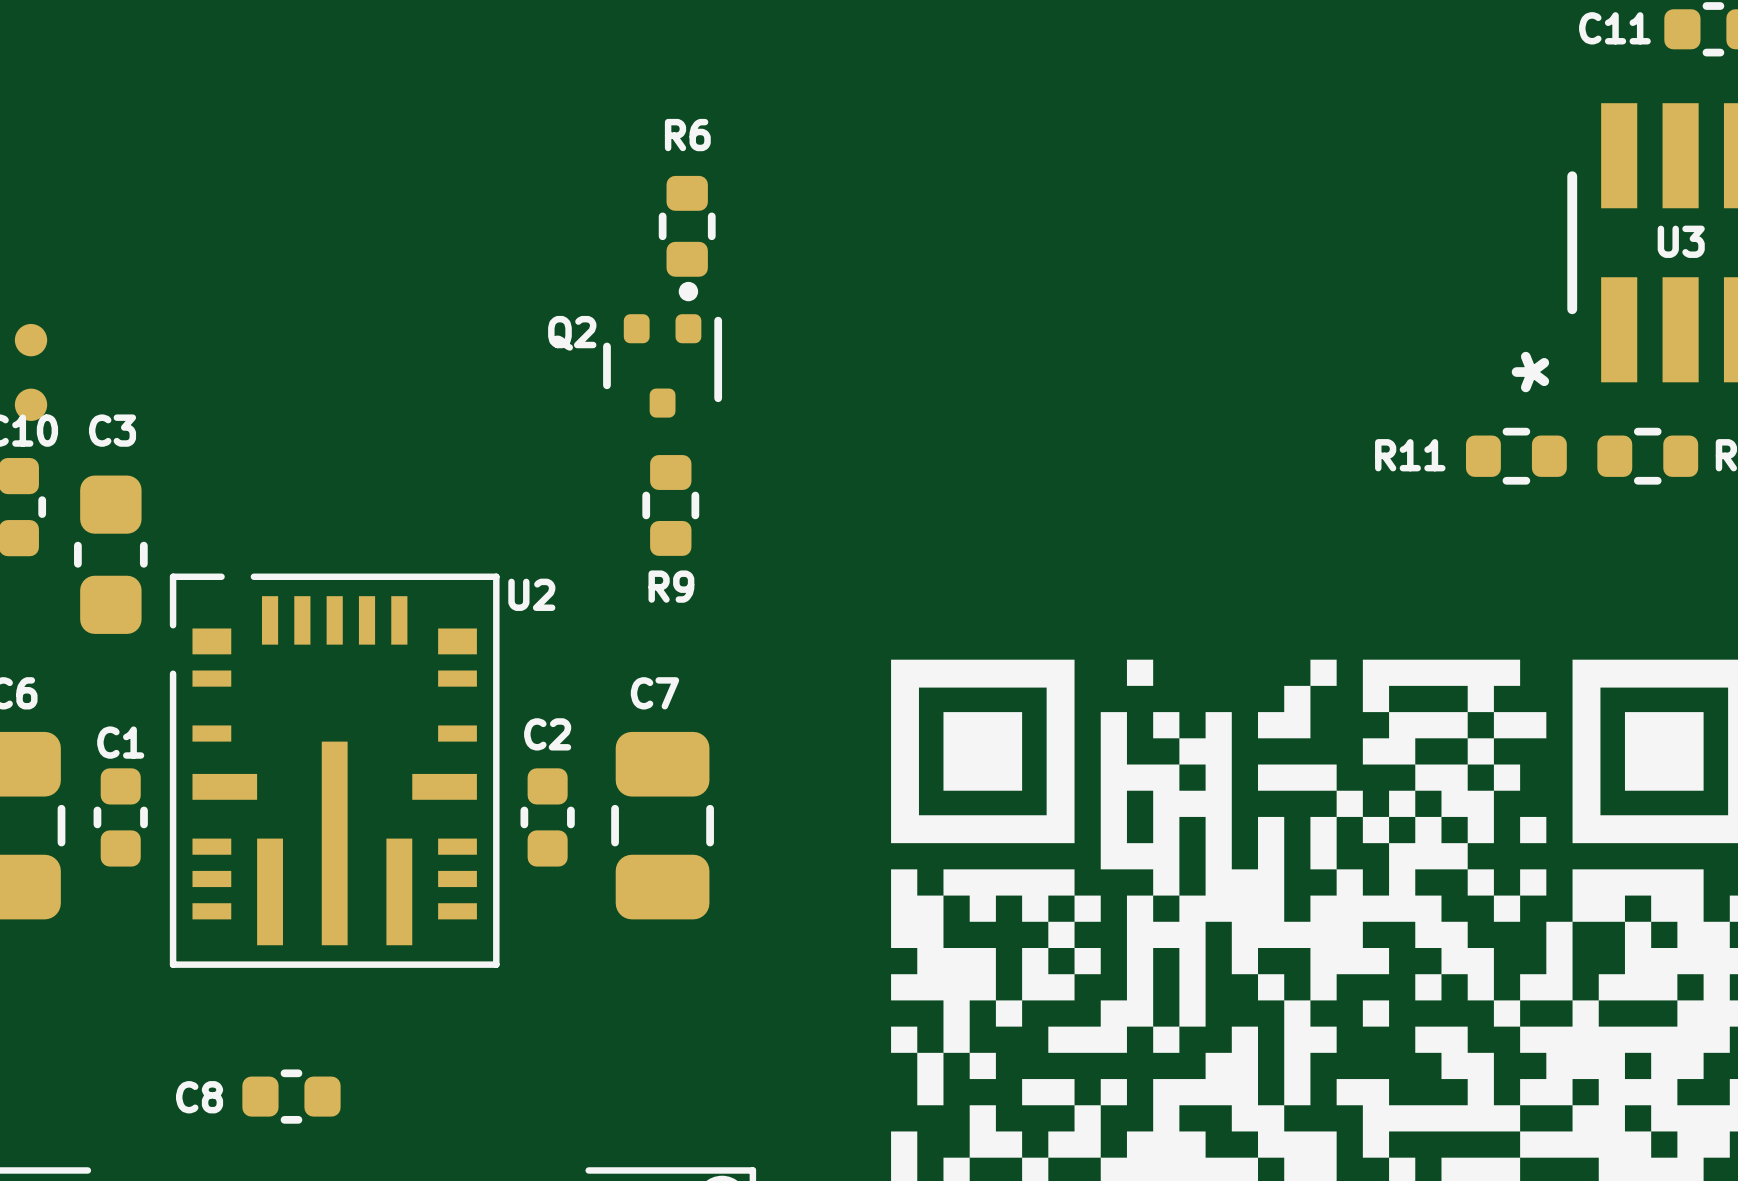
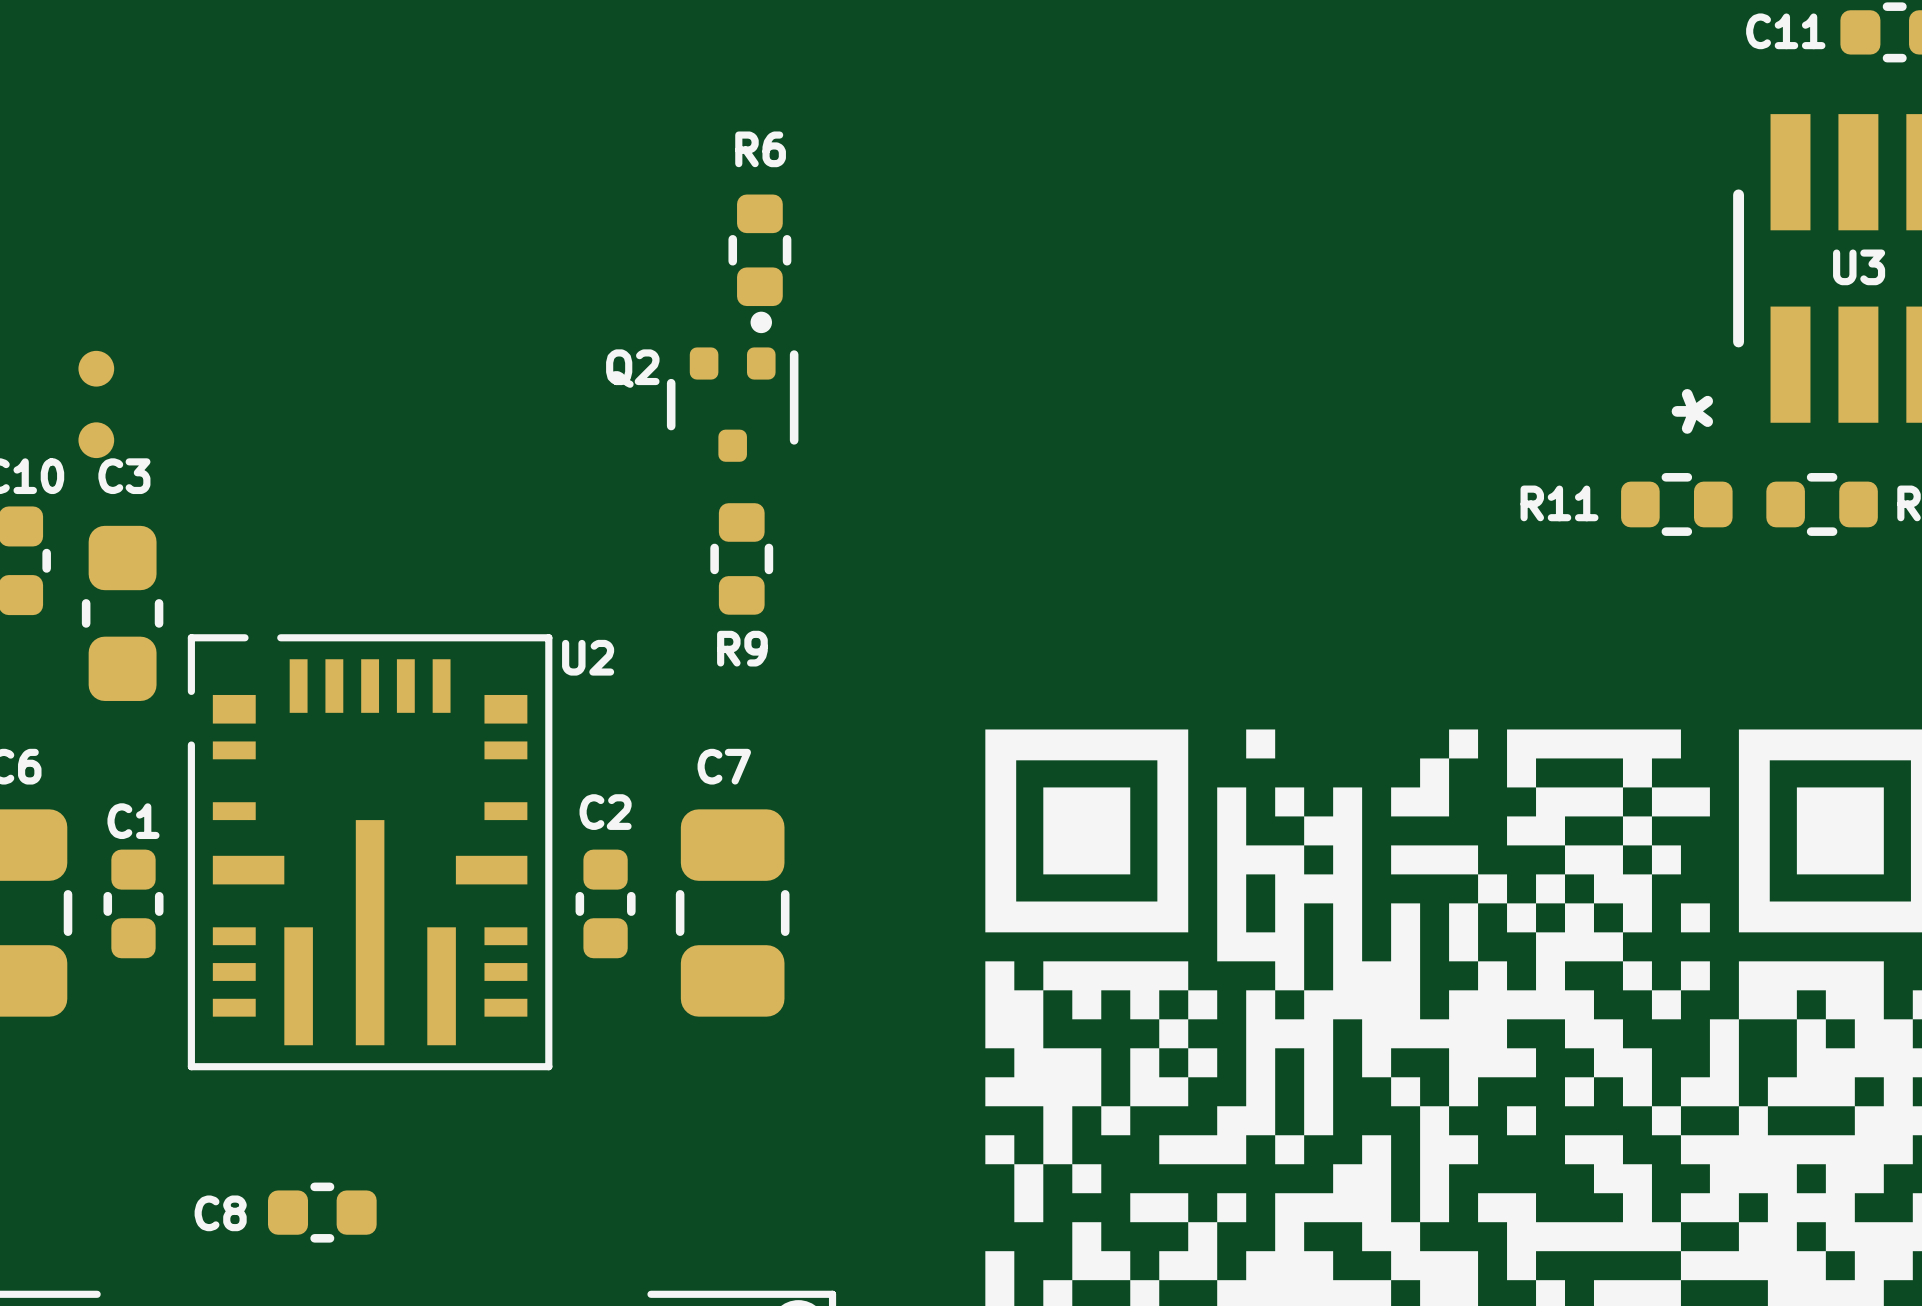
part position: (31, 372) -> (96, 404)

